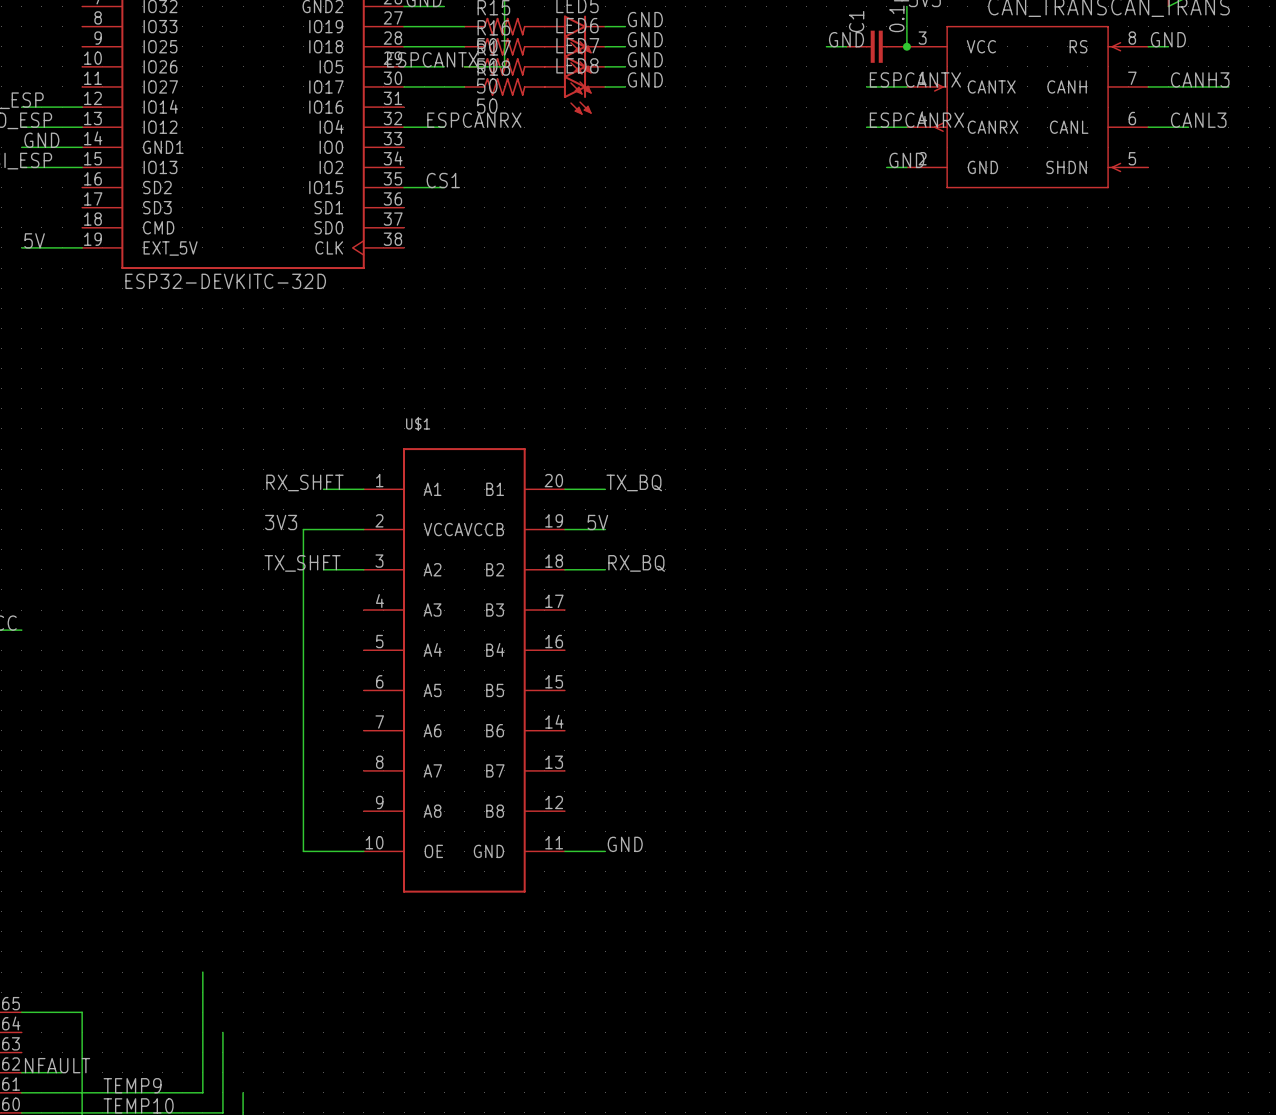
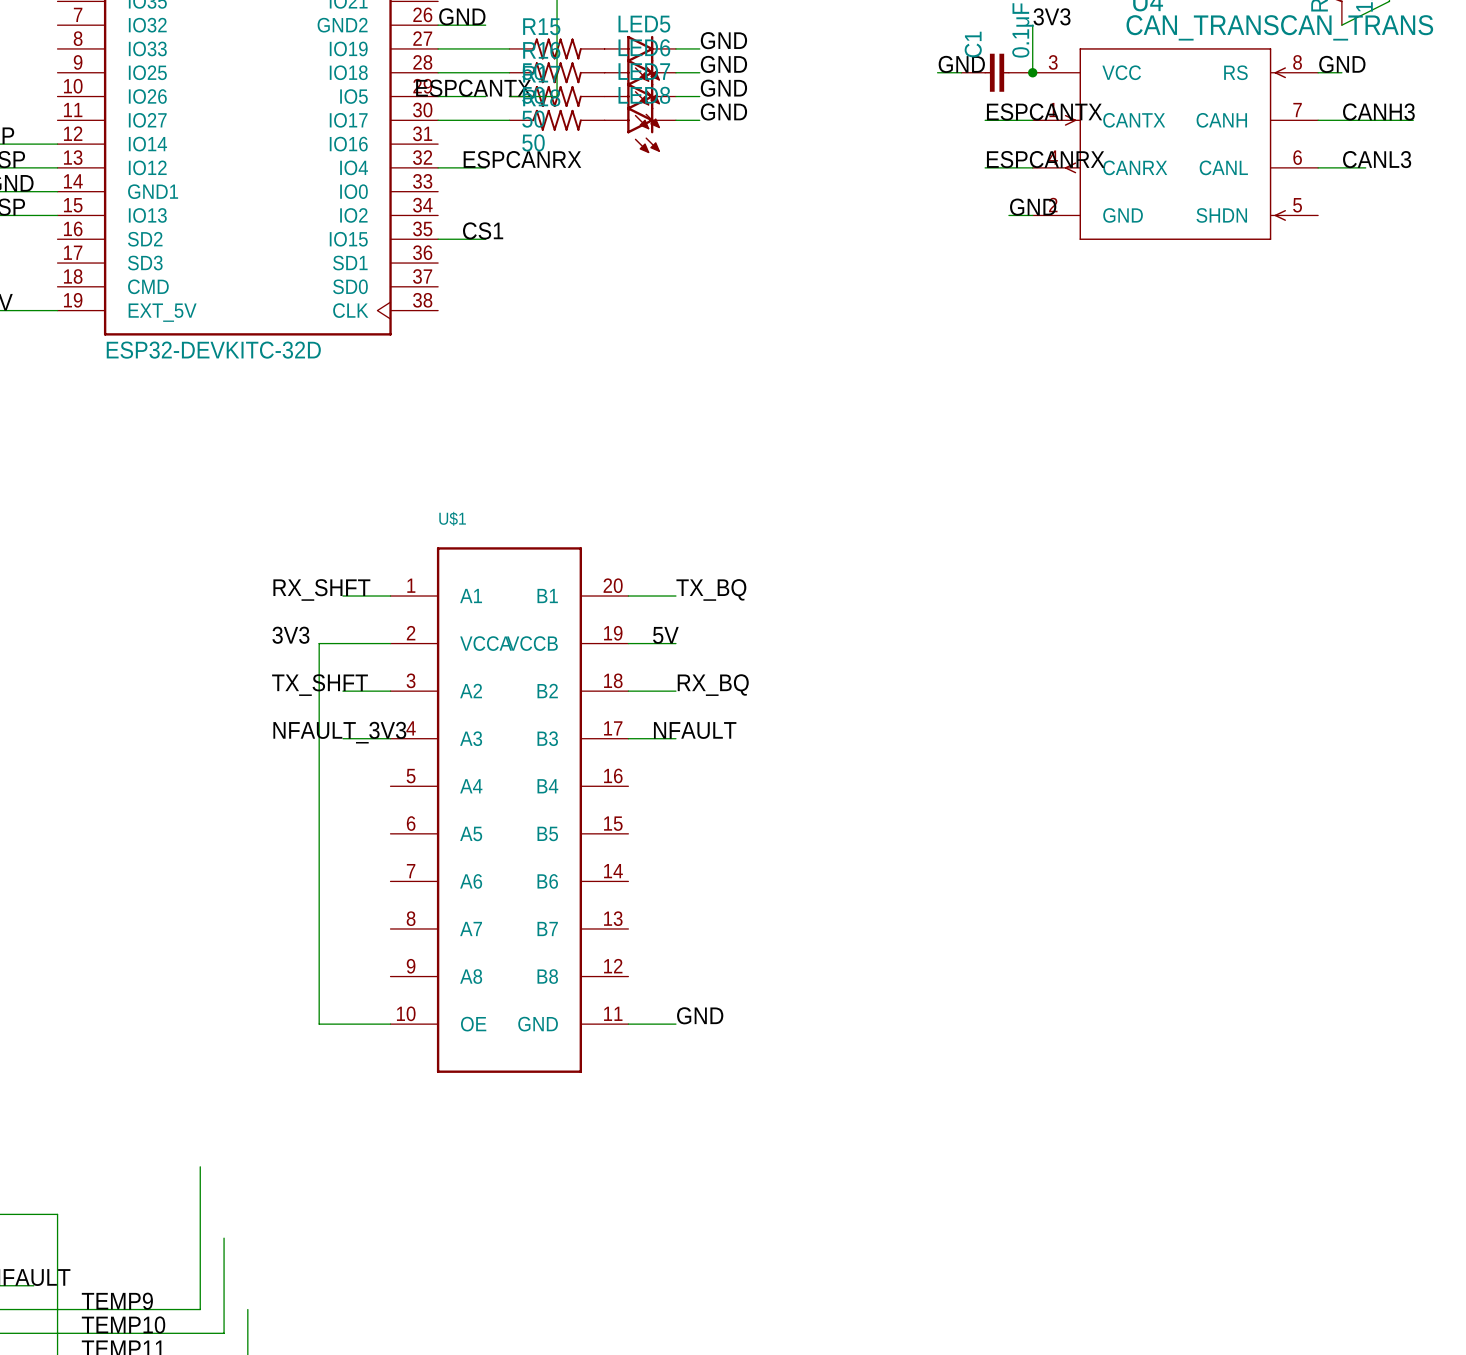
label: none -> NFAULT (695, 730)
label: none -> NFAULT_3V3 (339, 732)
wire: none -> (342, 738) (390, 738)
wire: none -> (628, 738) (675, 738)

